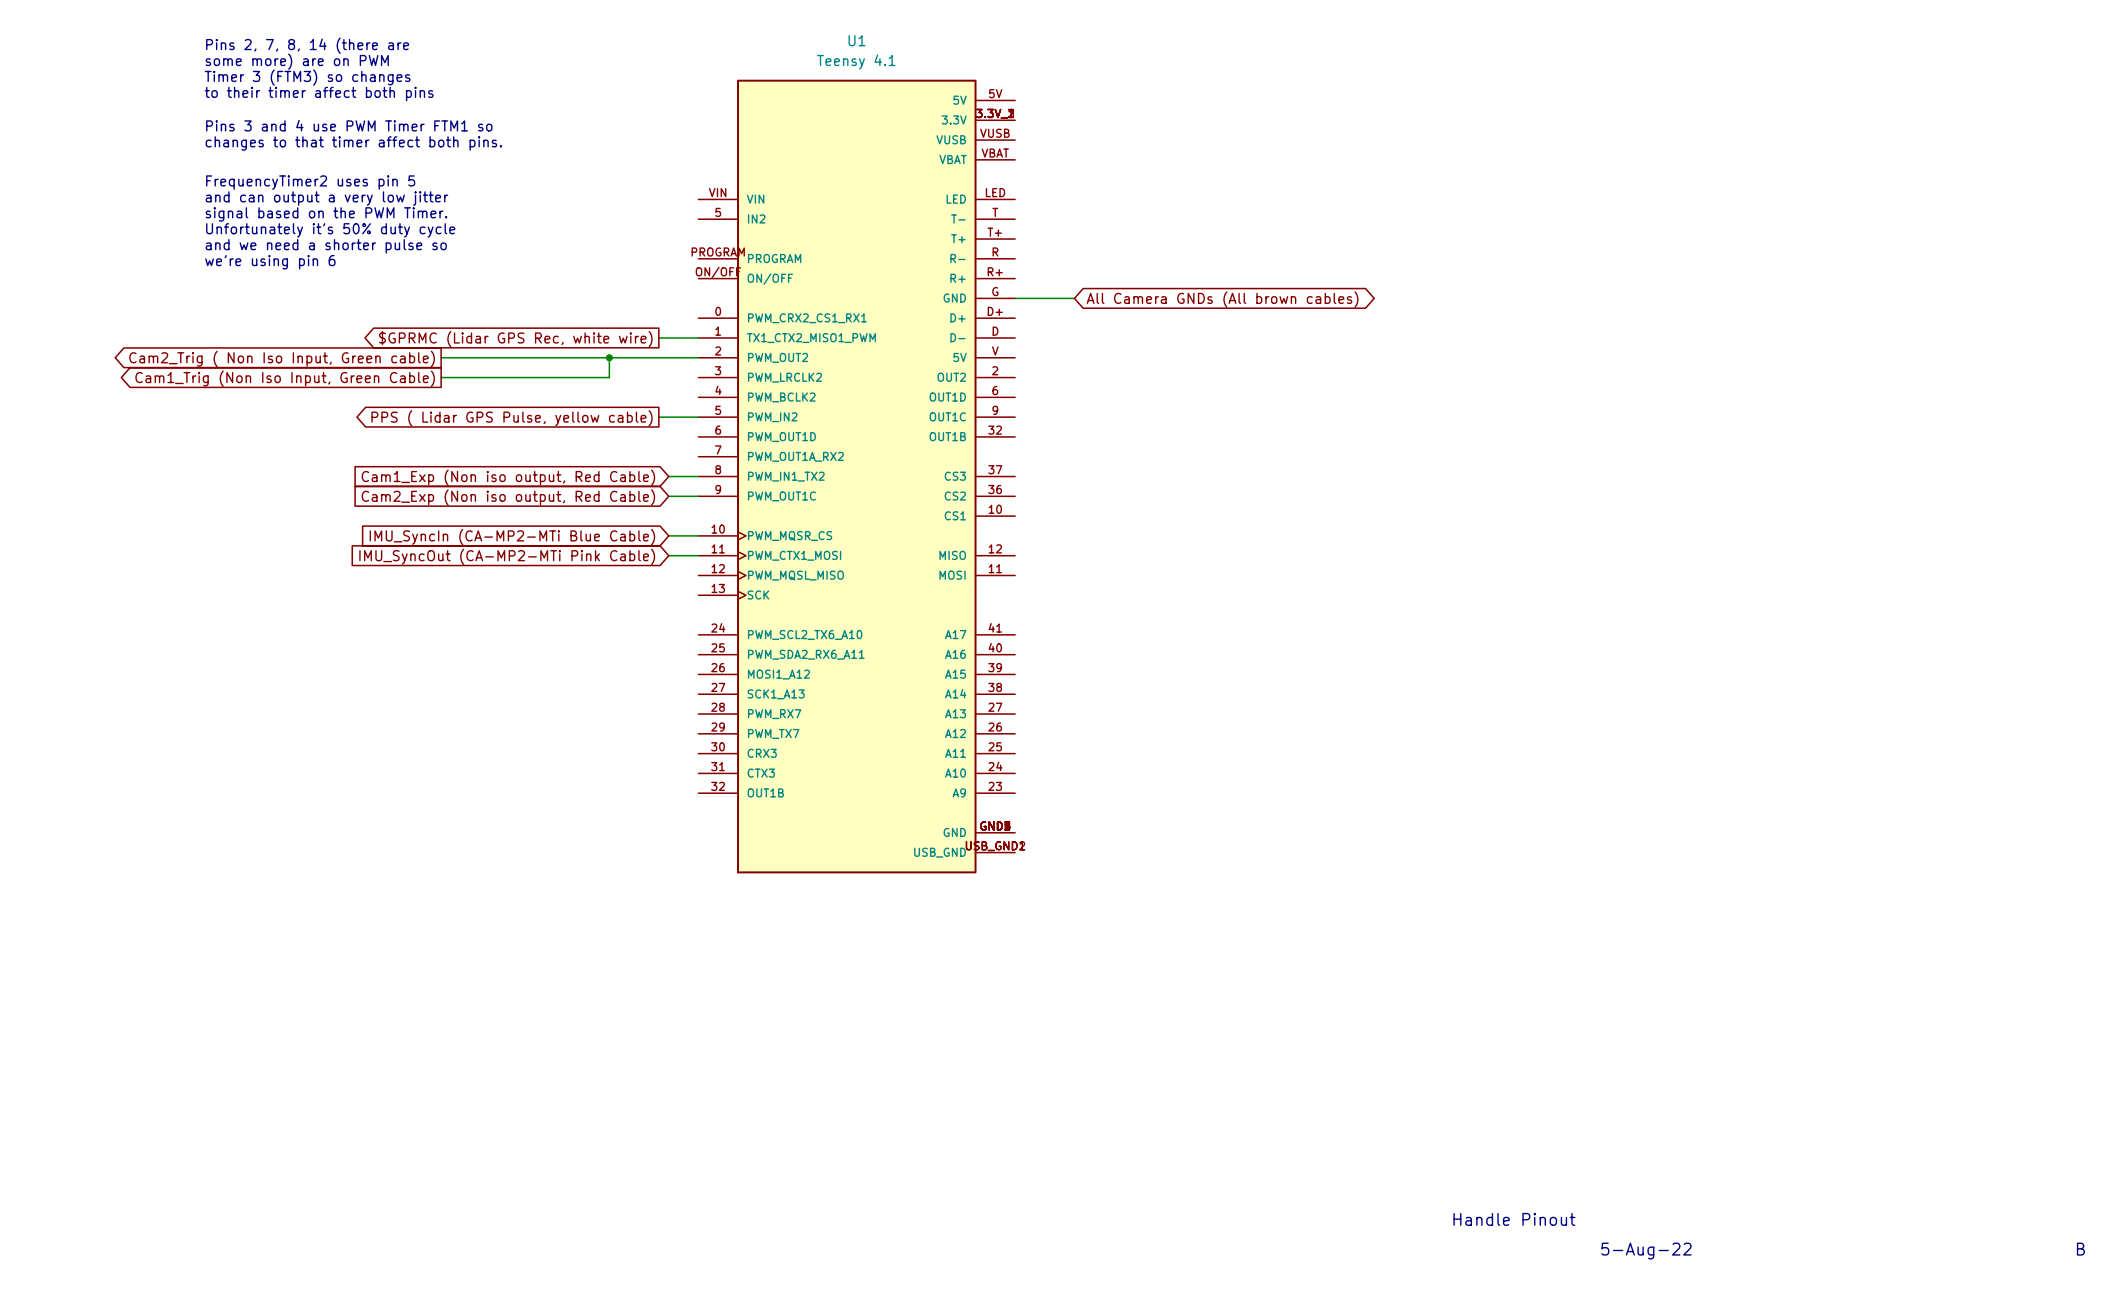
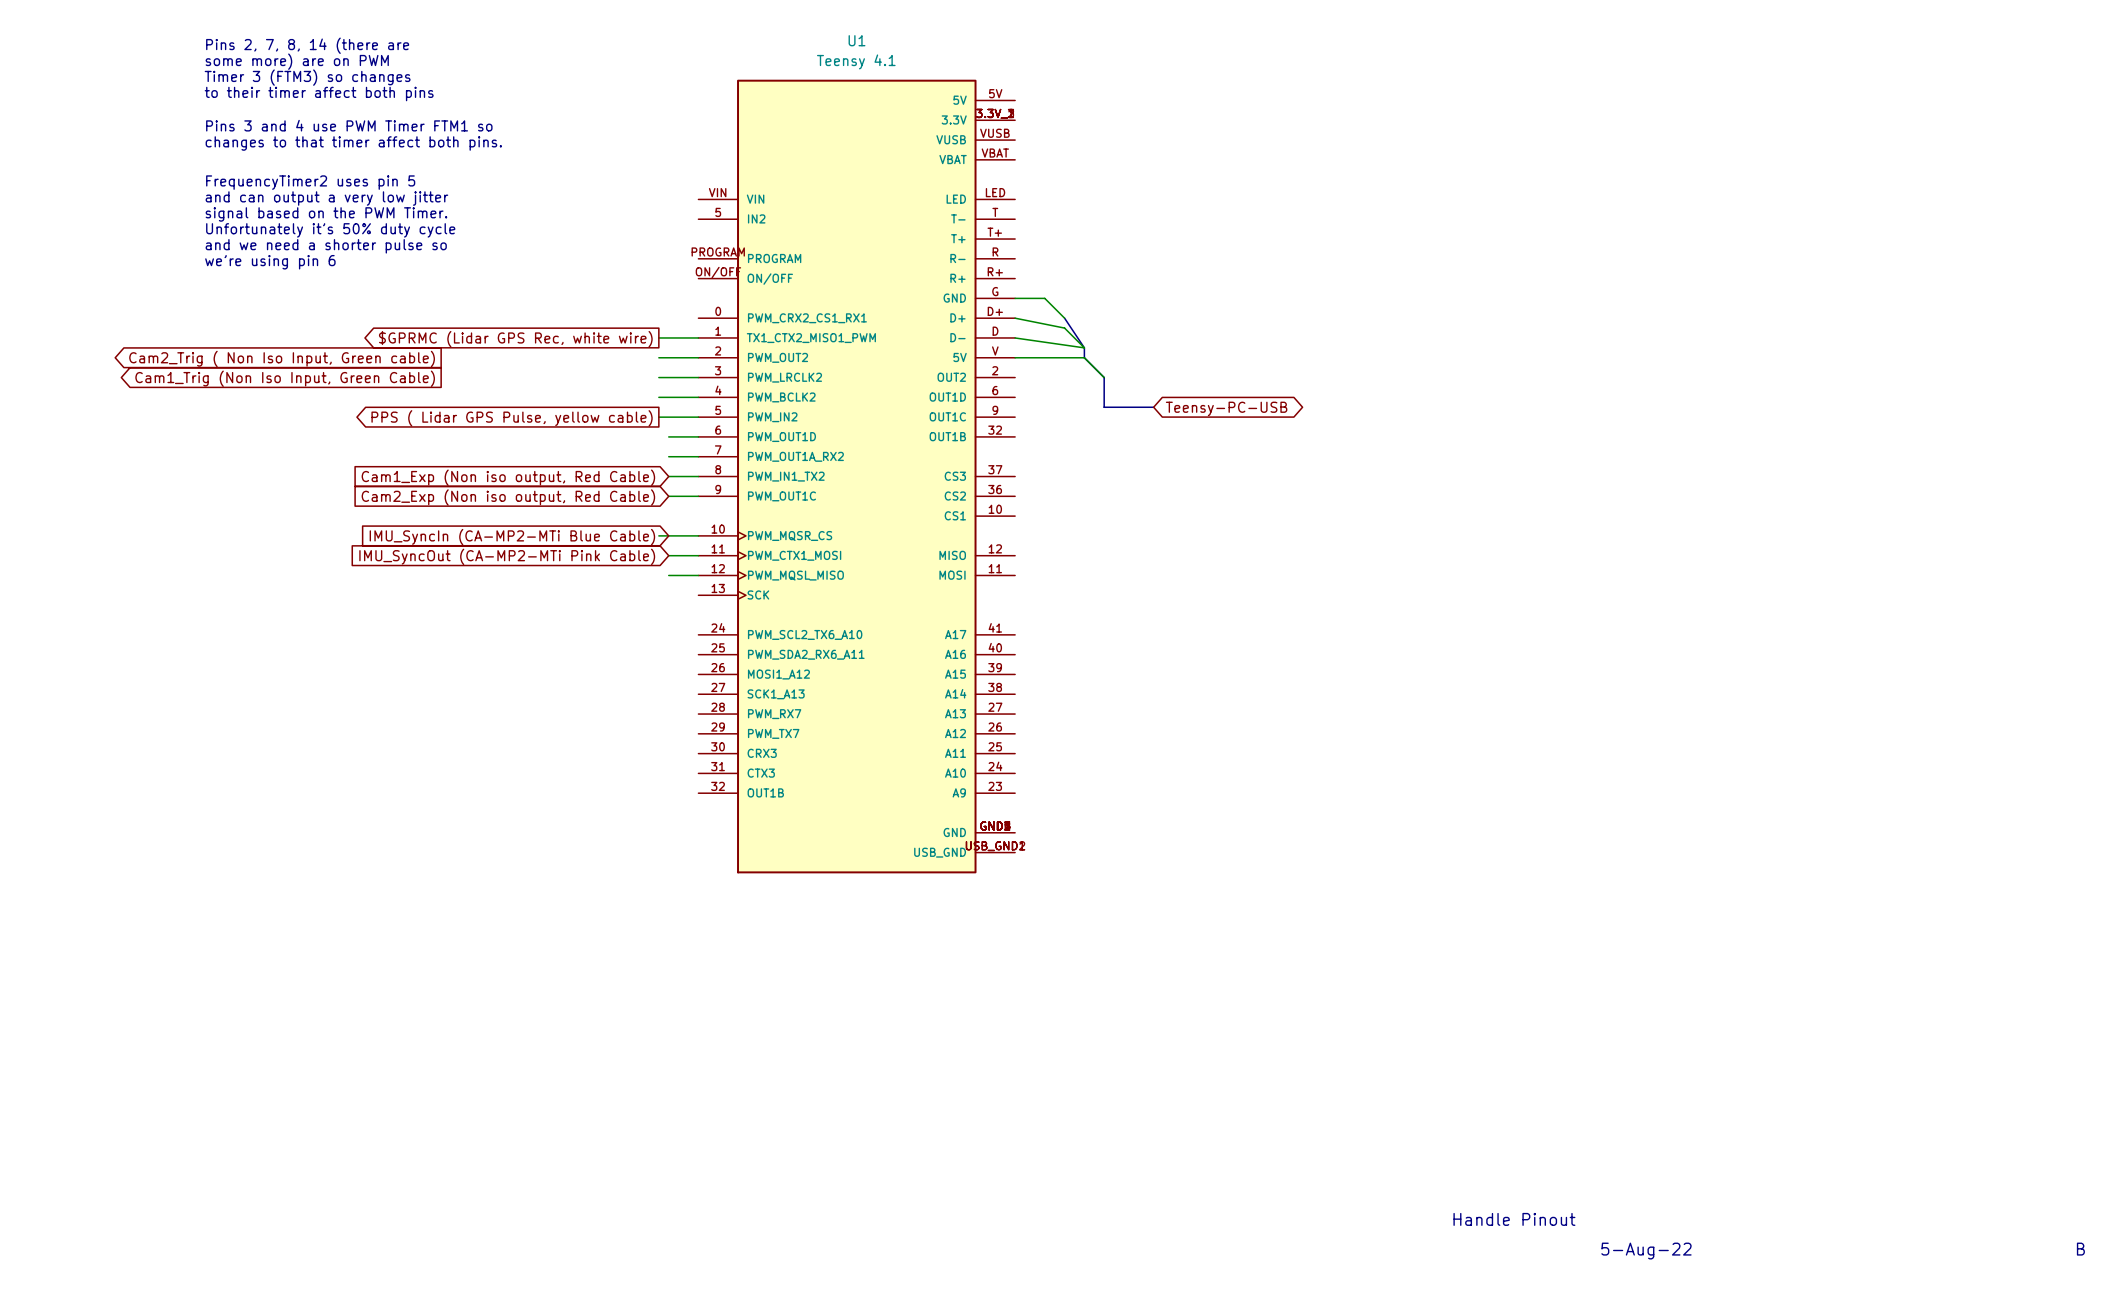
wire: (1044, 298) (1074, 298) -> (1044, 298) (1064, 318)
global label: All Camera GNDs (All brown cables) (1222, 299) -> none
wire: none -> (1015, 318) (1064, 328) (1084, 347) (1015, 337)
bus: none -> (1064, 318) (1084, 347) (1084, 357) (1104, 377) (1104, 407) (1153, 407)
wire: (441, 357) (658, 357) -> none
wire: (609, 357) (609, 377) (441, 377) -> none
junction: (609, 357) -> none
wire: none -> (1015, 357) (1084, 357) (1104, 377)
wire: none -> (658, 377) (698, 377)
wire: none -> (658, 397) (698, 397)
global label: none -> Teensy-PC-USB (1226, 408)
wire: none -> (668, 436) (698, 436)
wire: none -> (668, 456) (698, 456)
wire: none -> (658, 535) (668, 535)
wire: none -> (668, 575) (698, 575)

